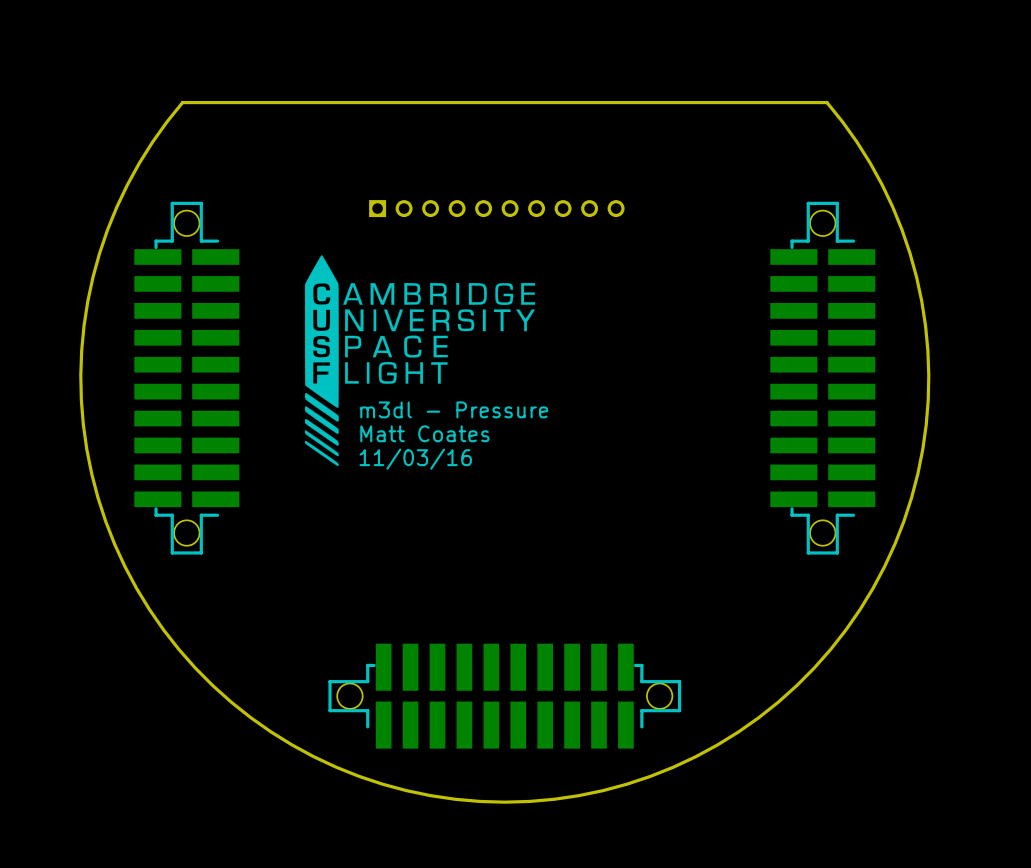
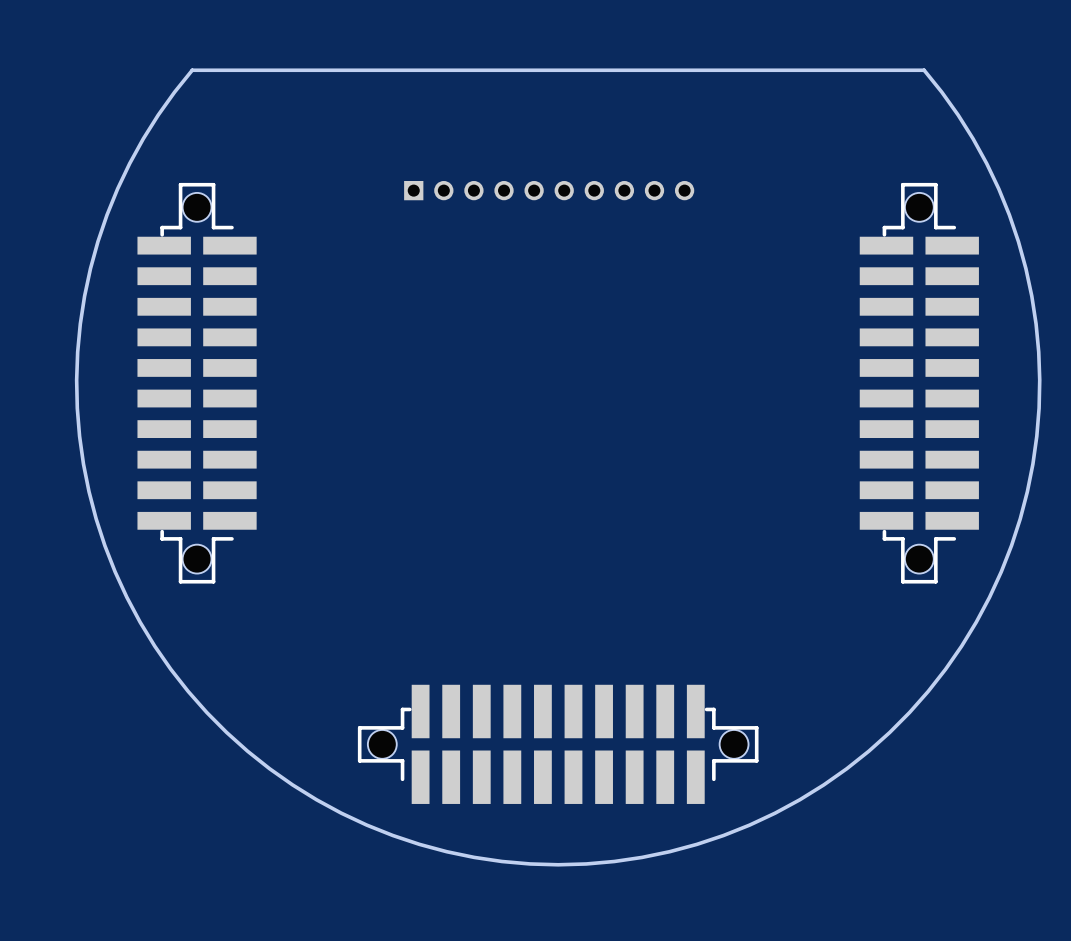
drawing: [304, 255, 536, 467] -> none
text: m3dl - Pressure (454, 409) -> none
text: Matt Coates (424, 433) -> none
text: 11/03/16 (415, 459) -> none

